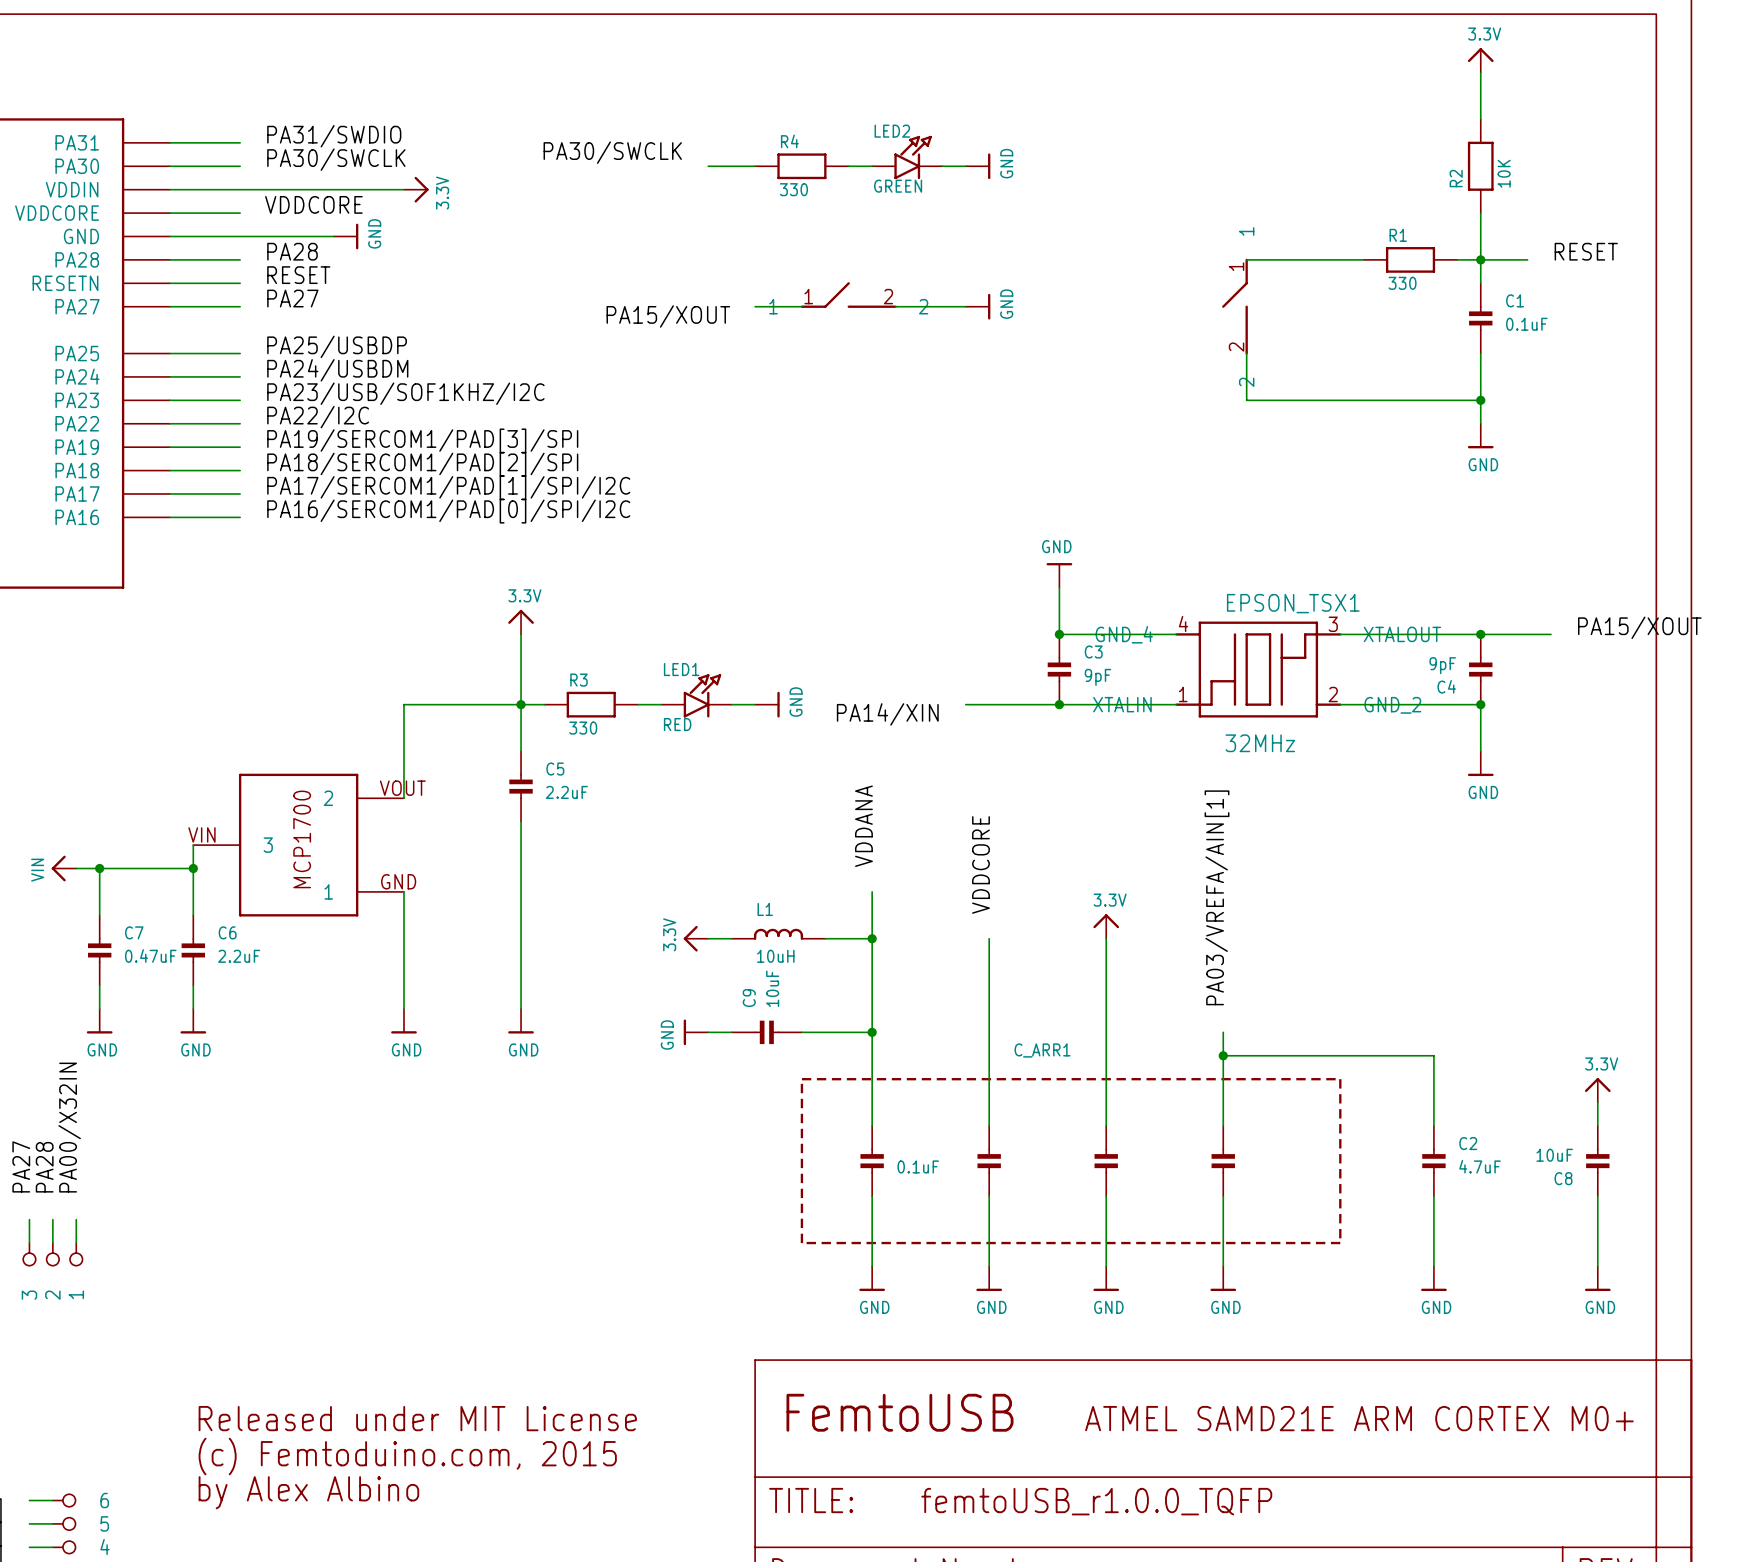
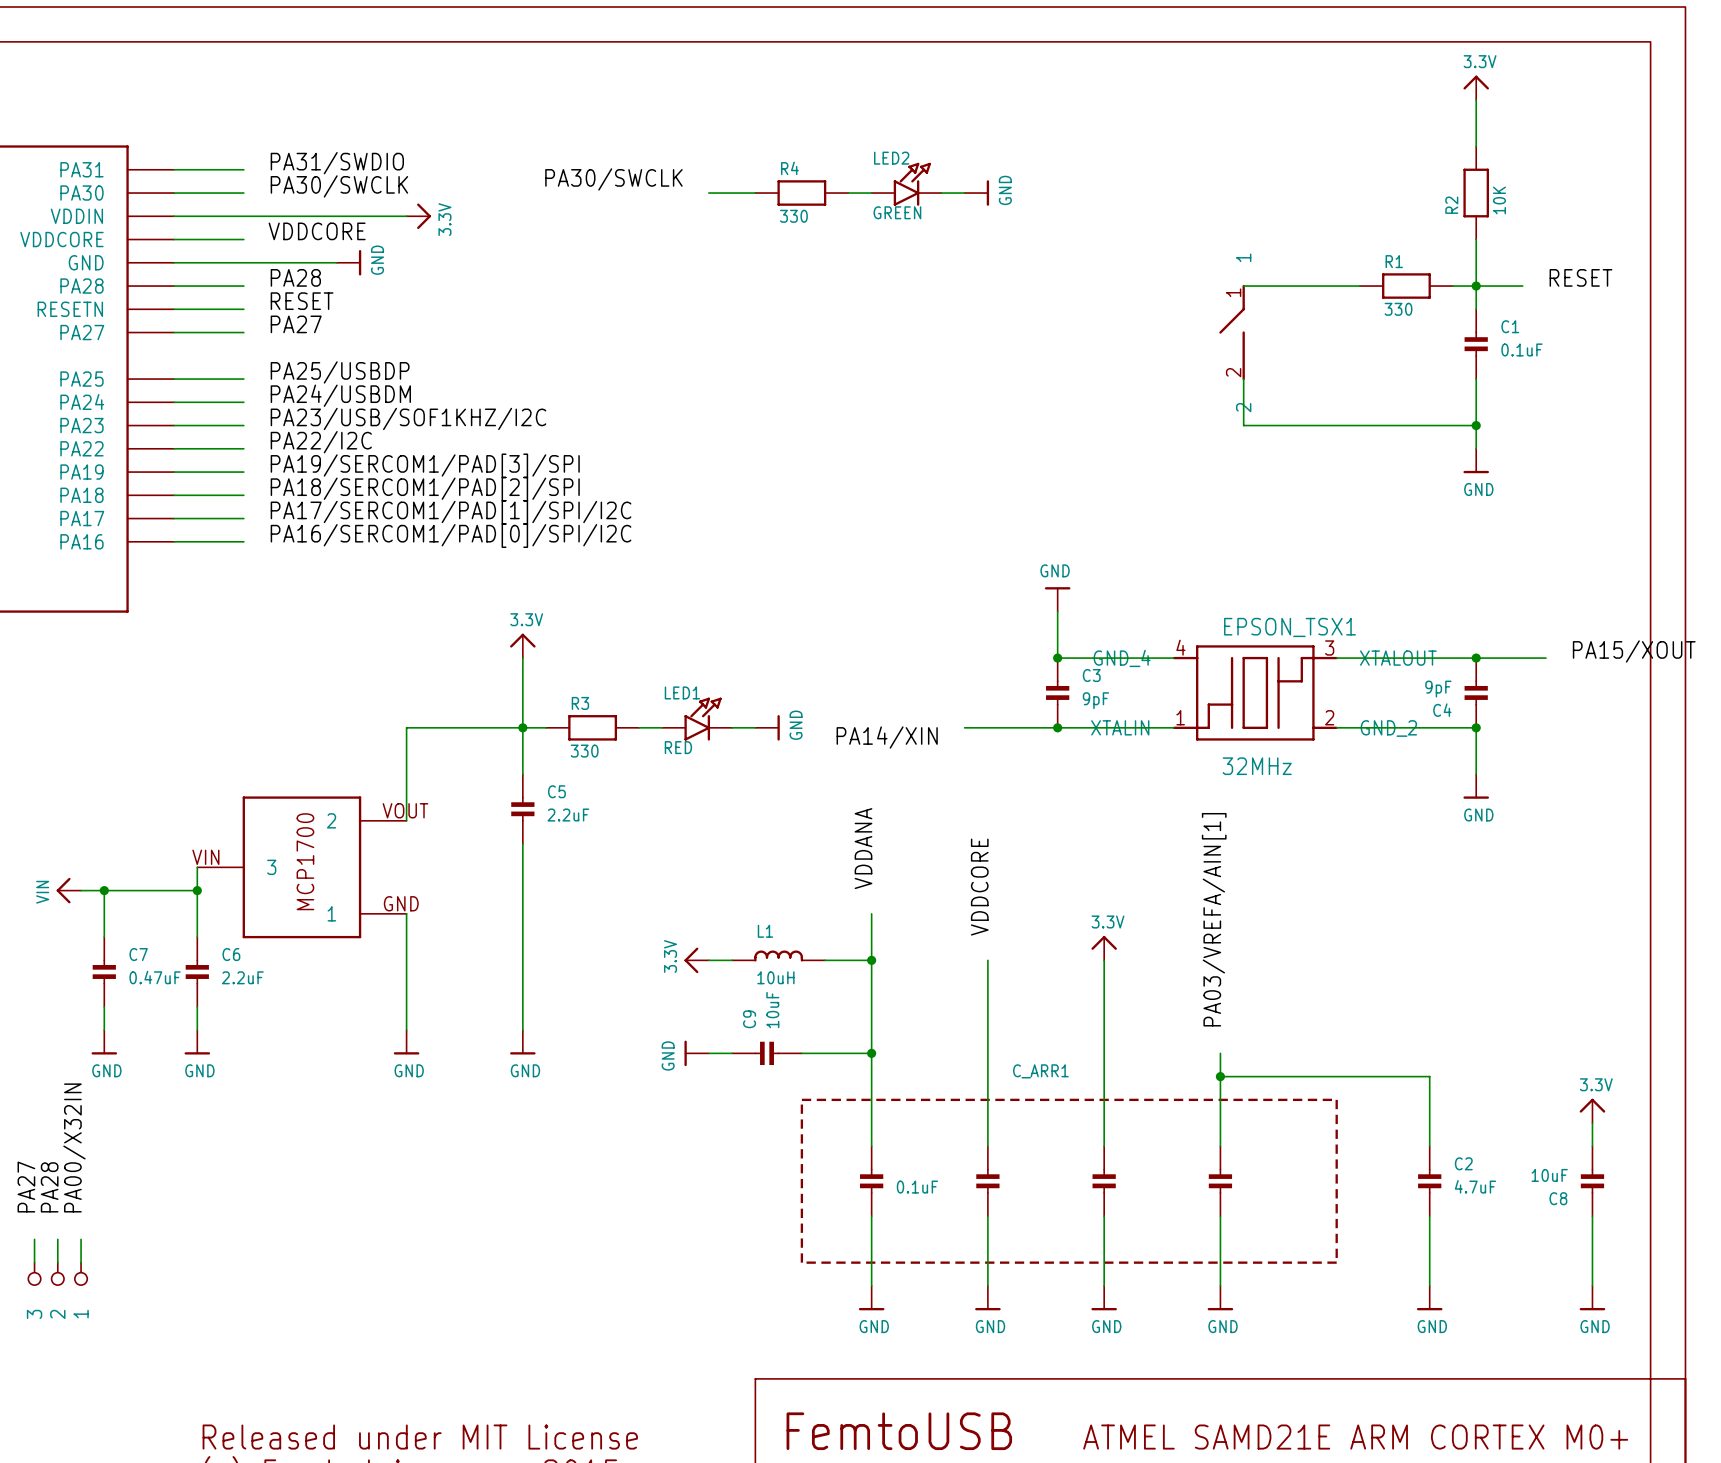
part: (848, 295) -> none
wire: (755, 306) (801, 306) -> none
wire: (895, 306) (965, 306) -> none
power symbol: GND (978, 306) -> none
label: PA15/XOUT (668, 316) -> none

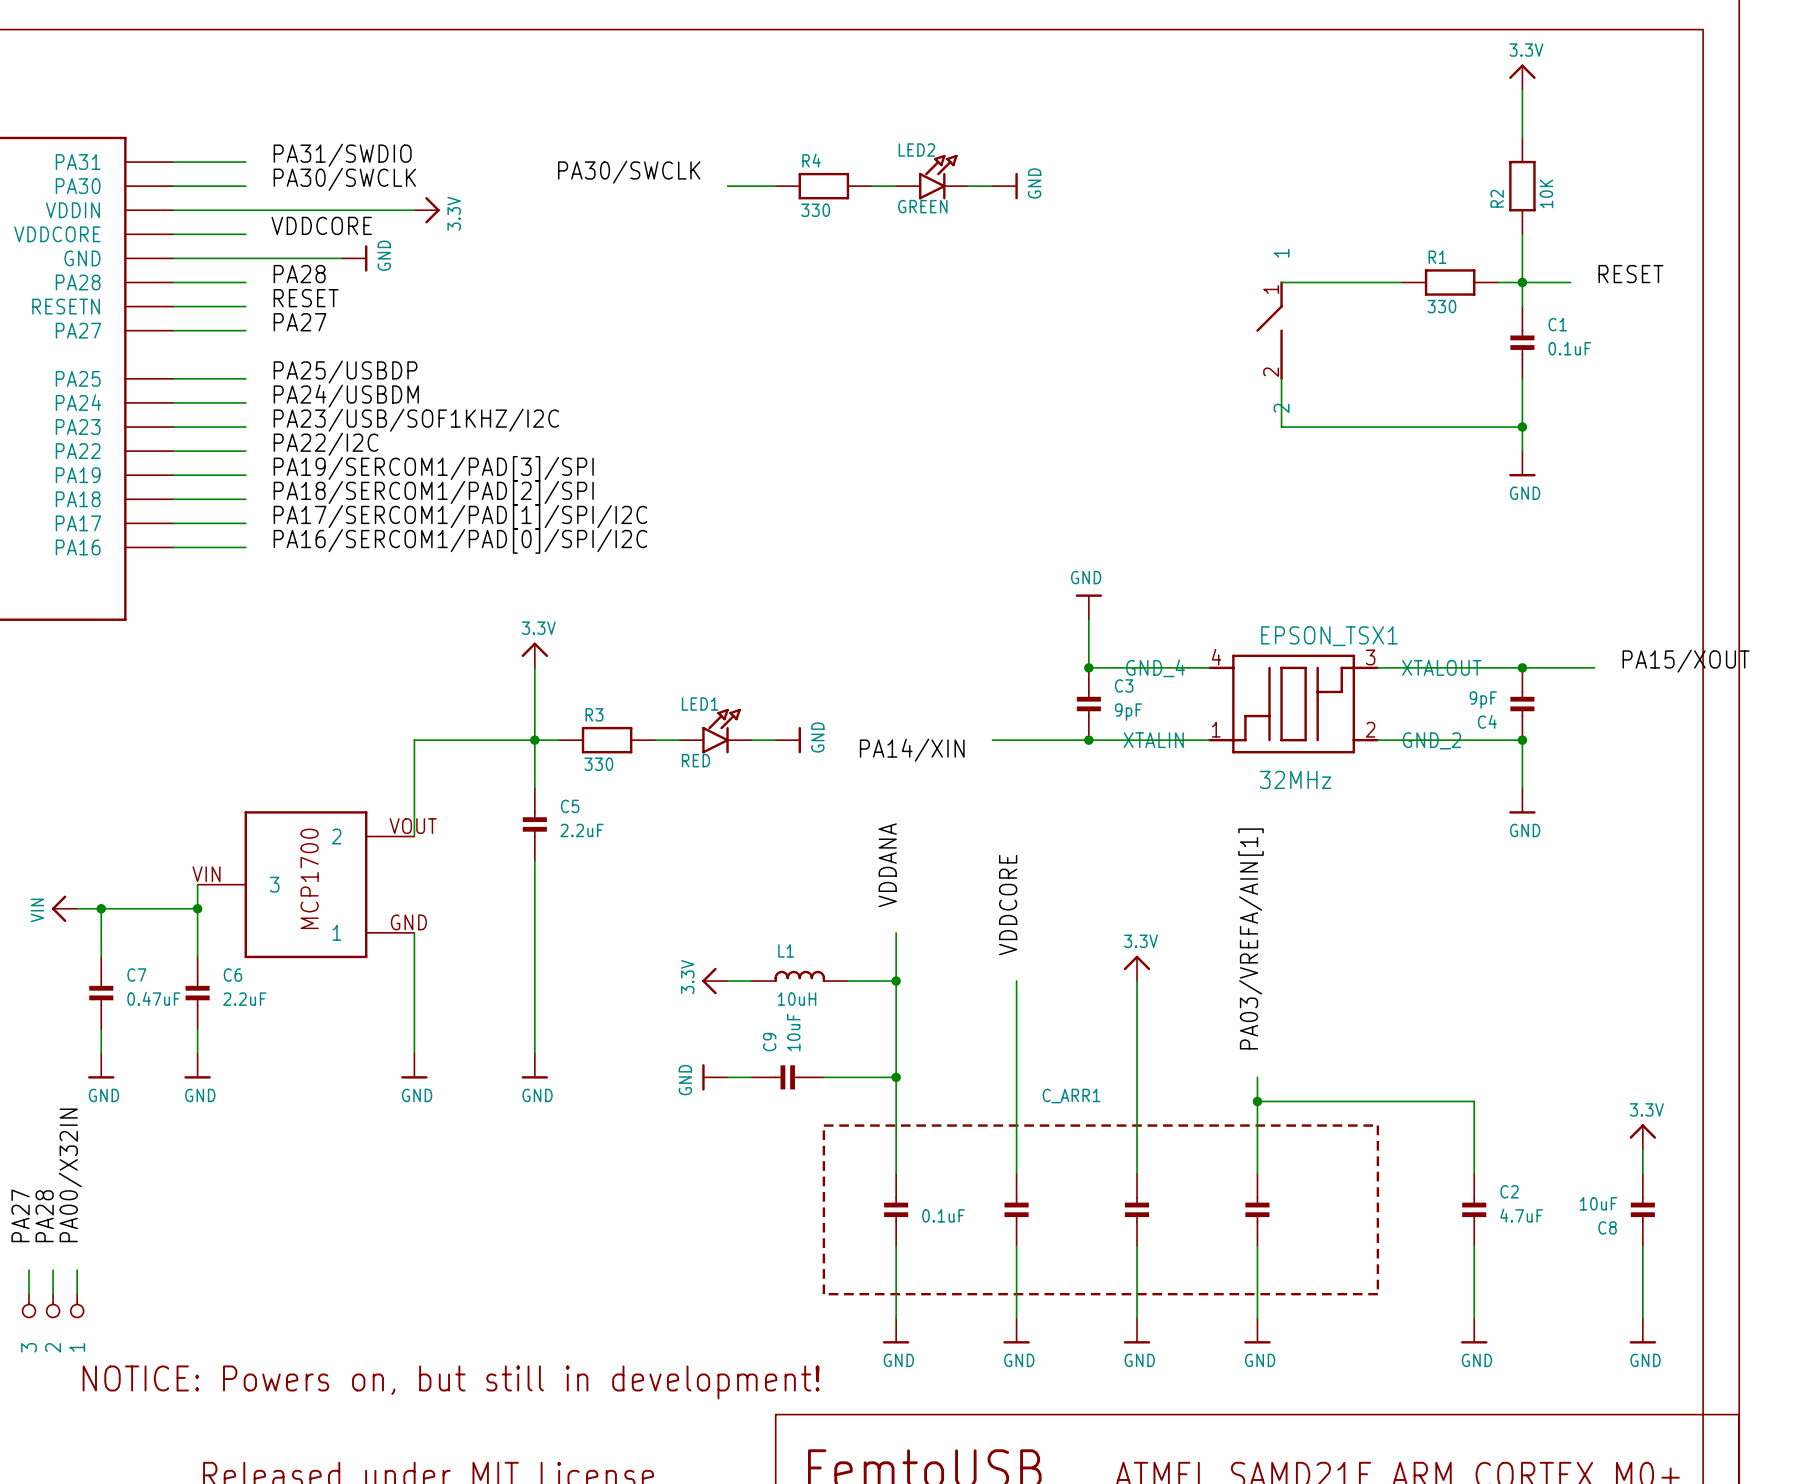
text: none -> NOTICE: Powers on, but still in development! (451, 1382)

